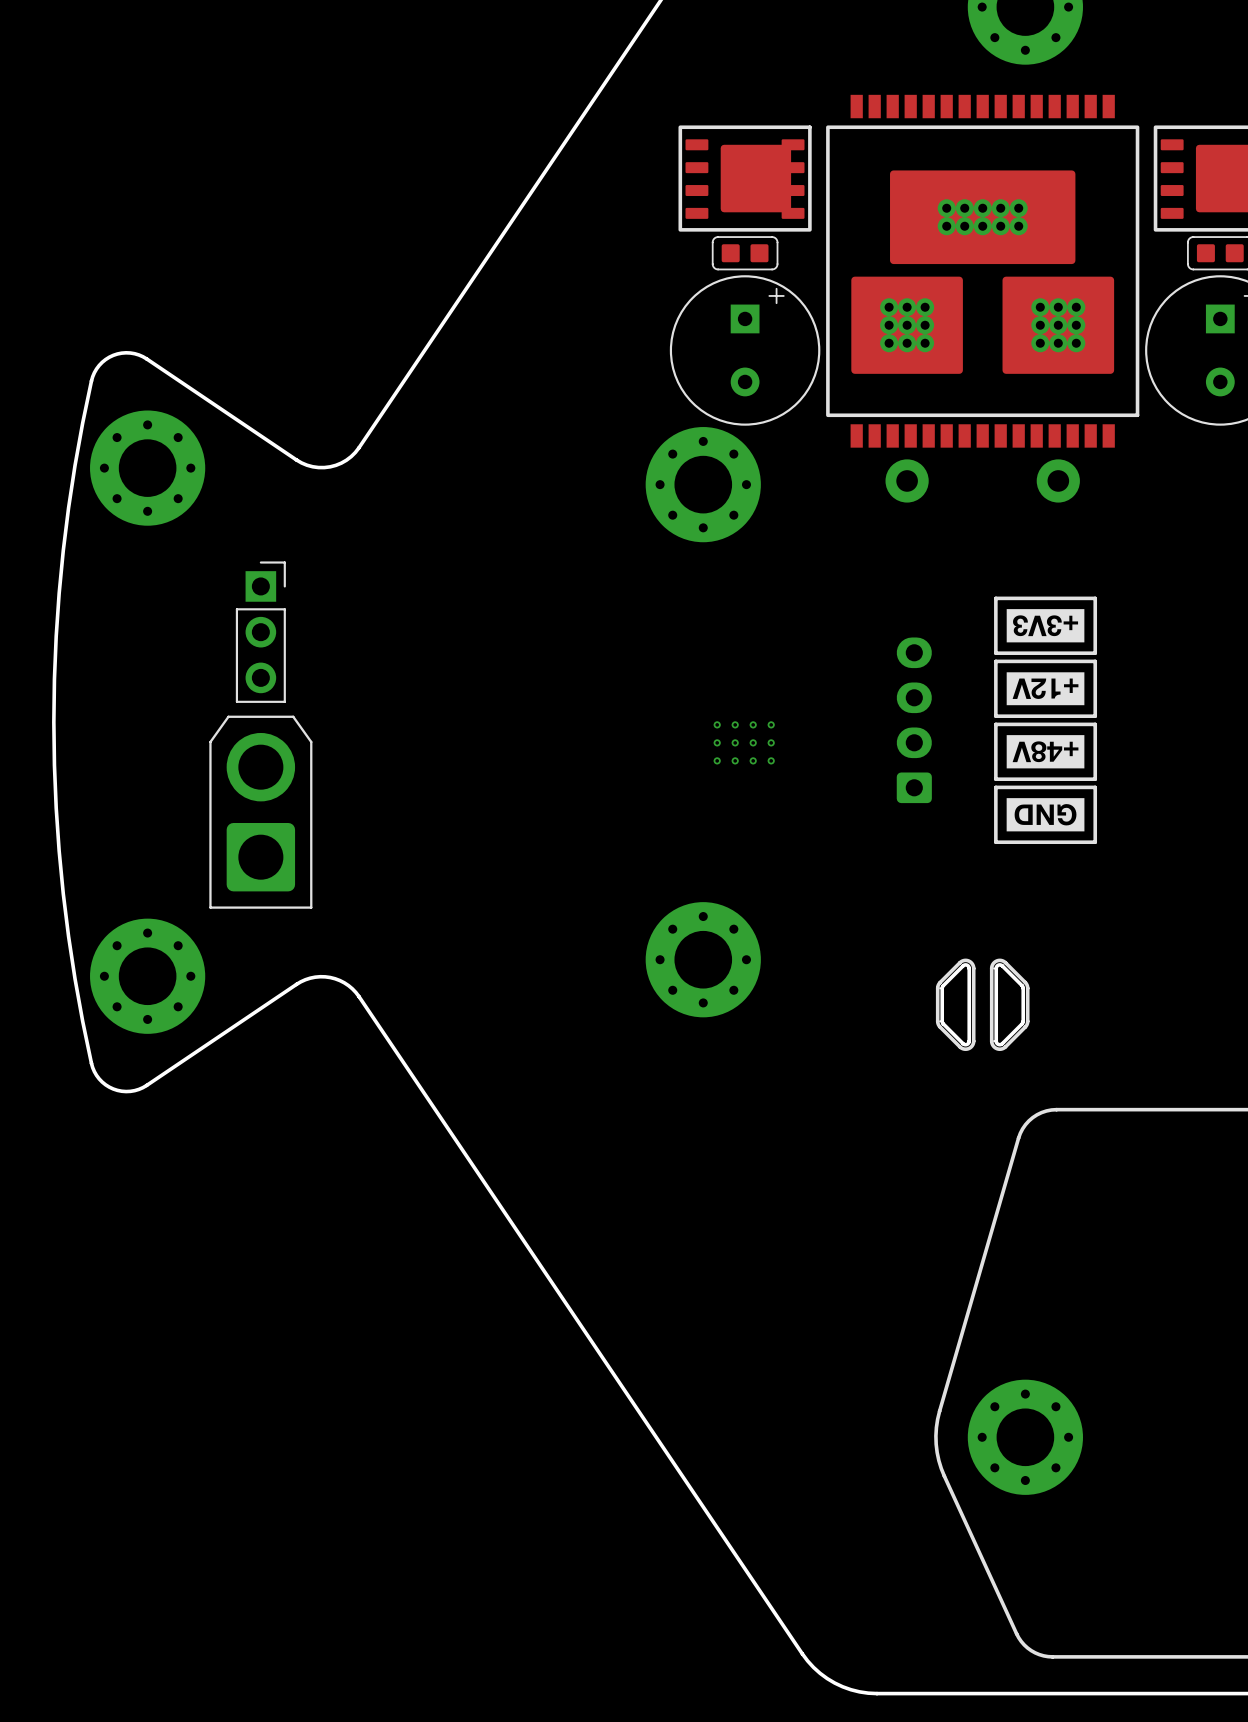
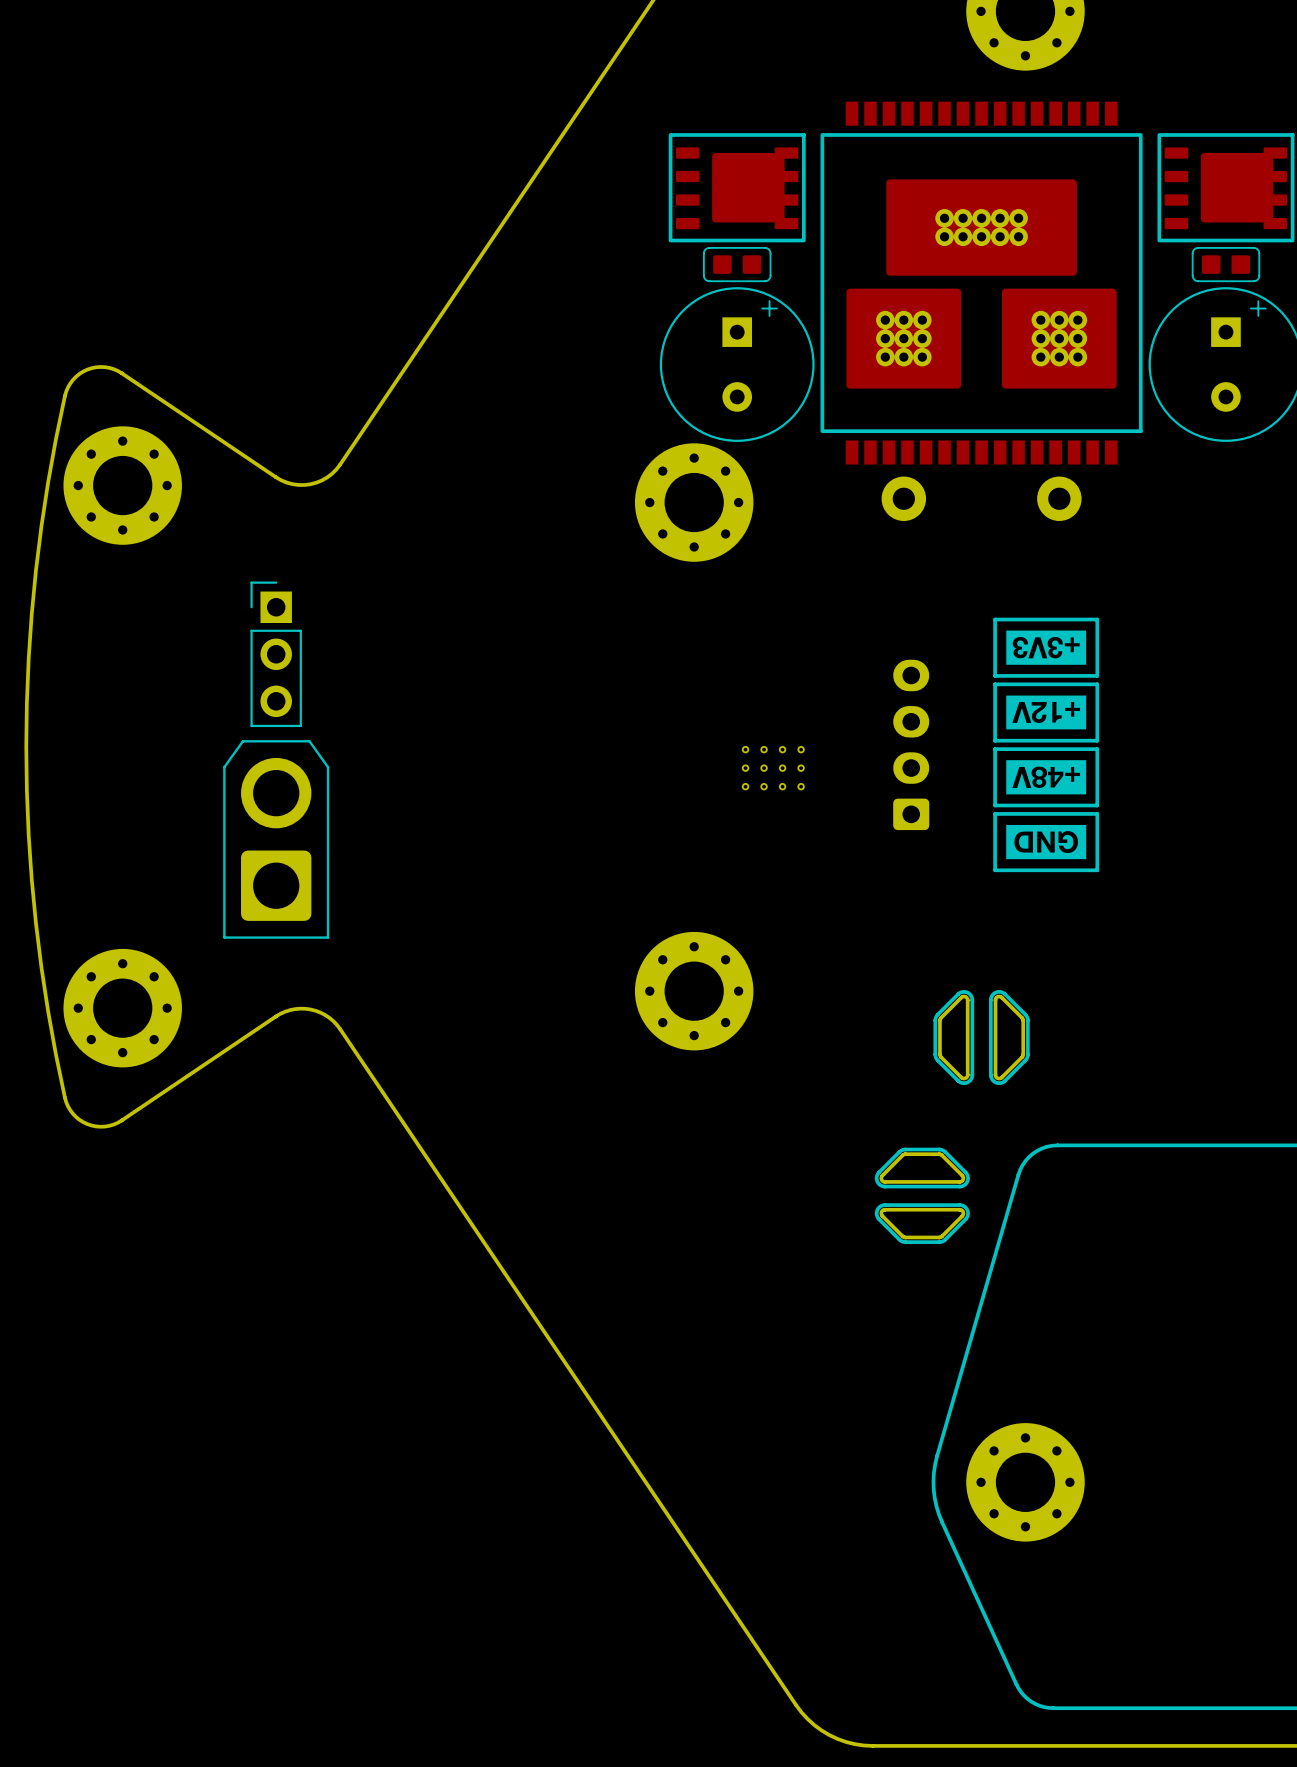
part: (260, 632) -> none
part: none -> (276, 654)
part position: (744, 742) -> (773, 768)
part position: (260, 812) -> (276, 839)
drawing: none -> [874, 1147, 970, 1244]

